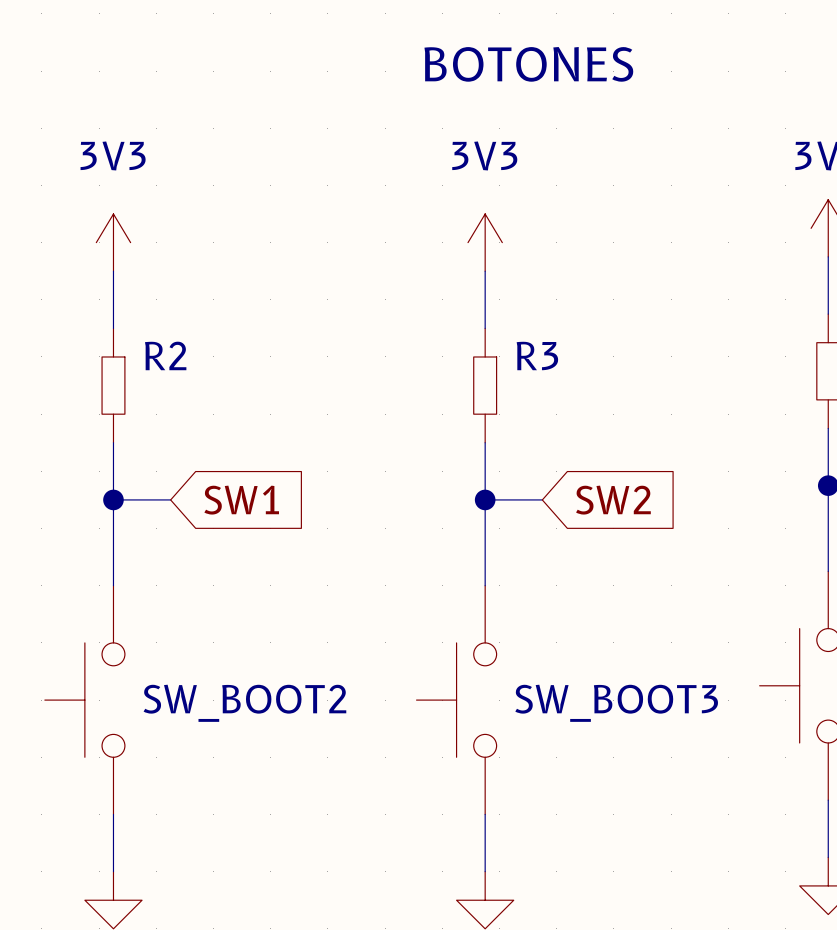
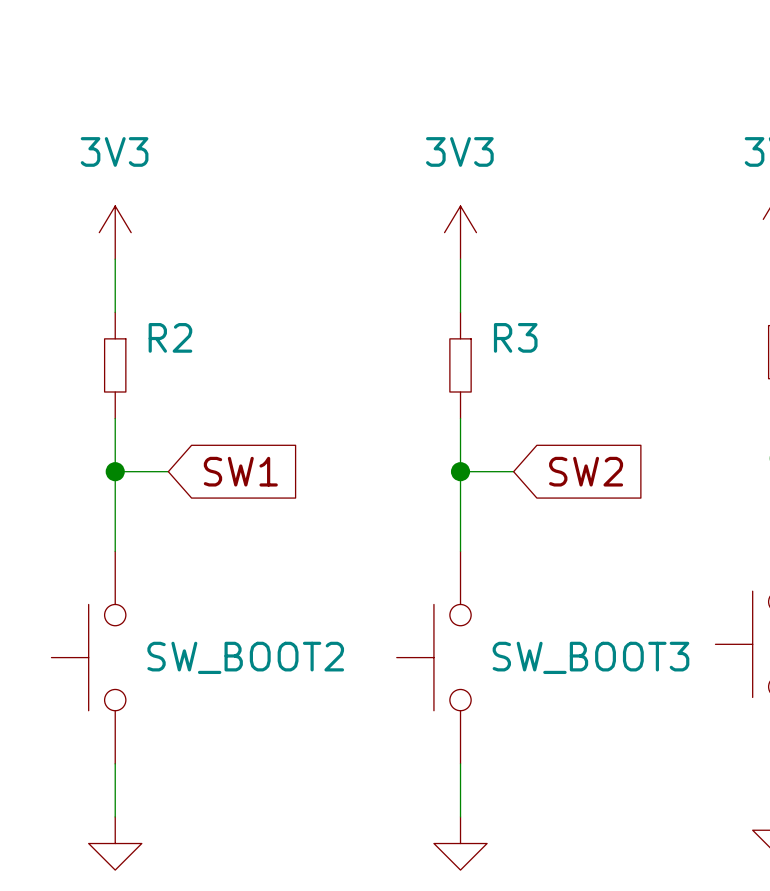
text: BOTONES (528, 64) -> none

